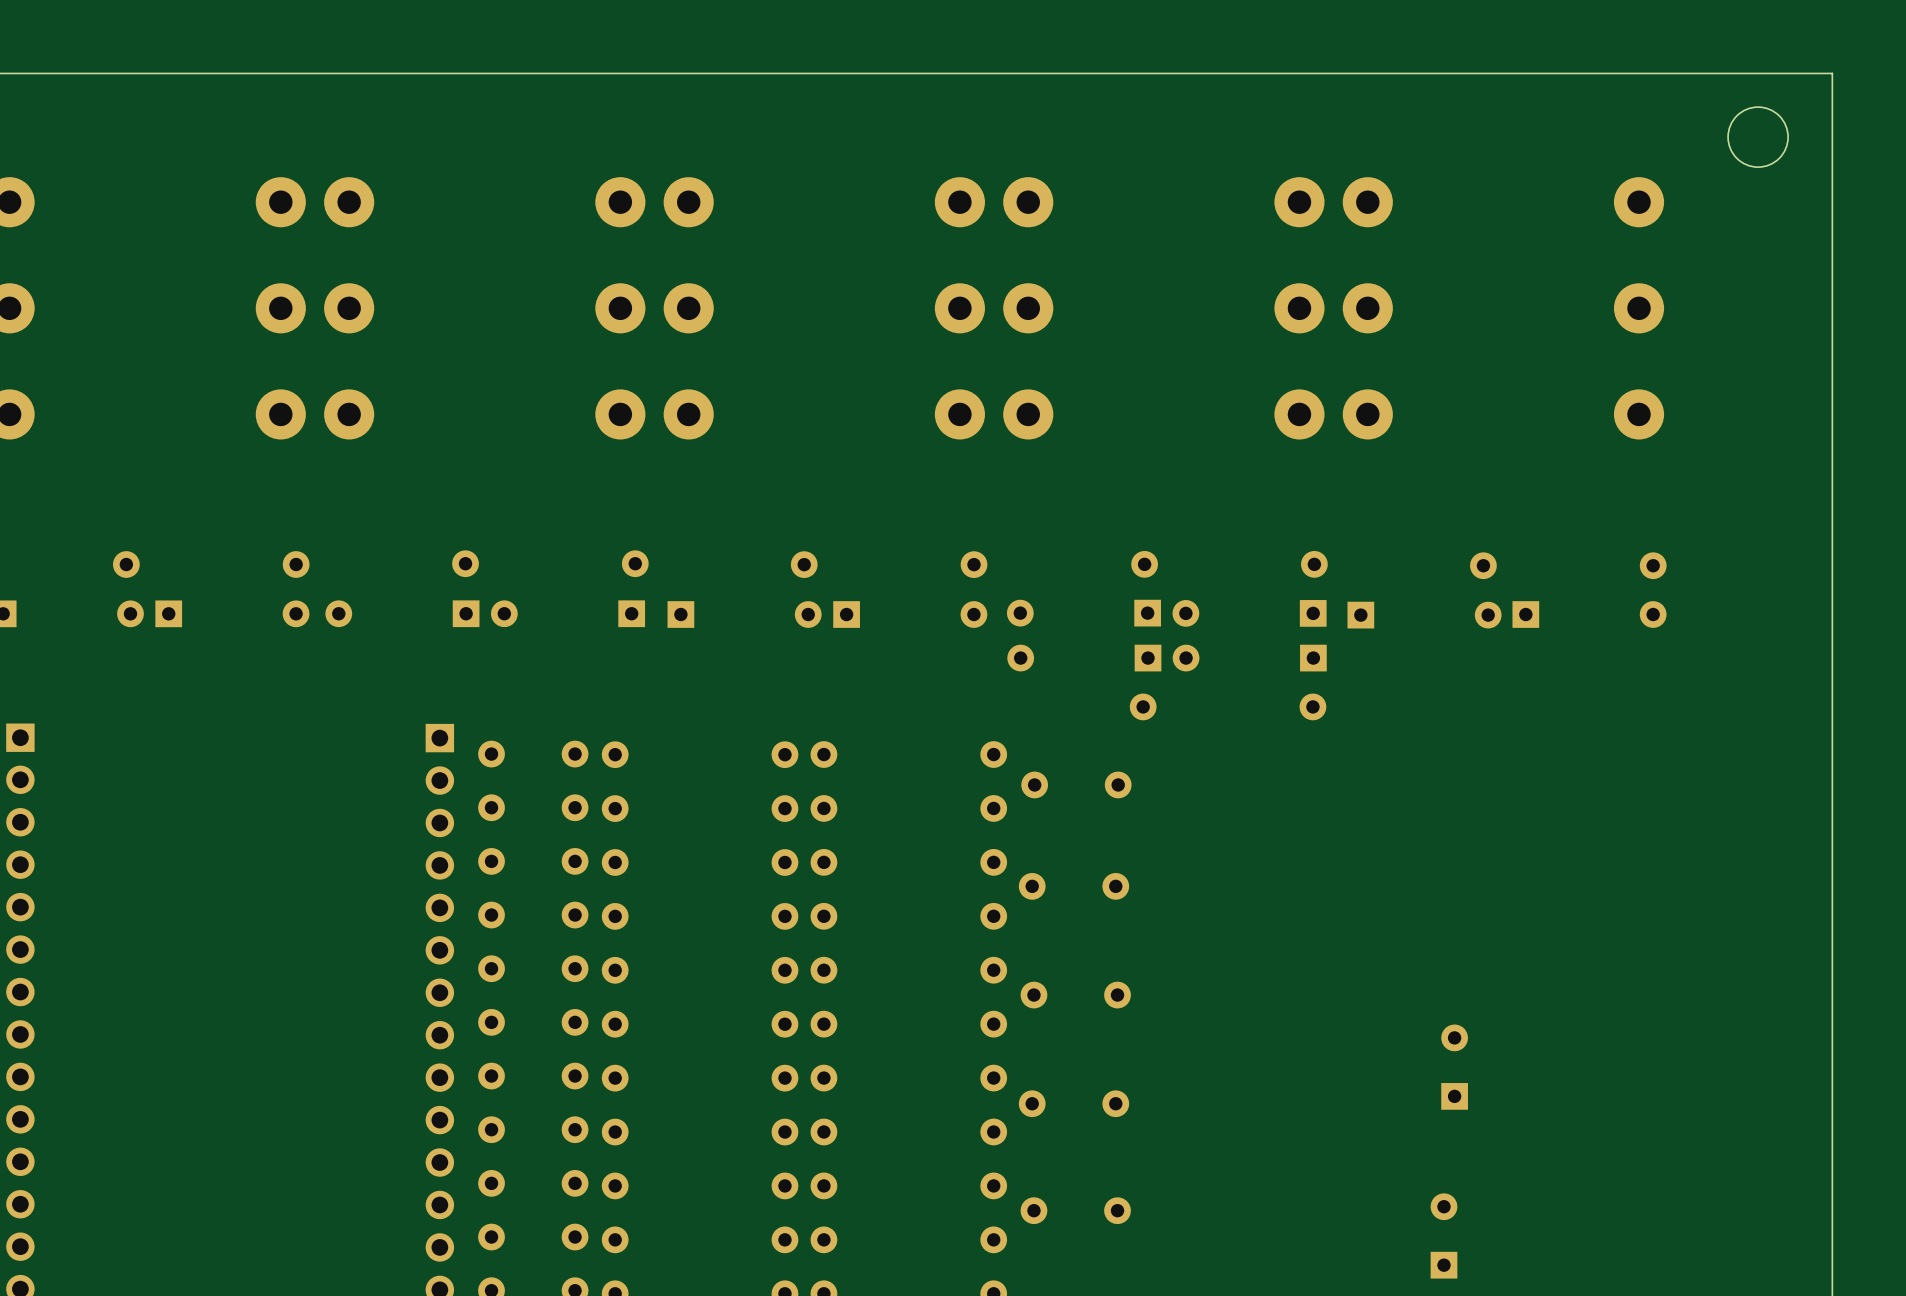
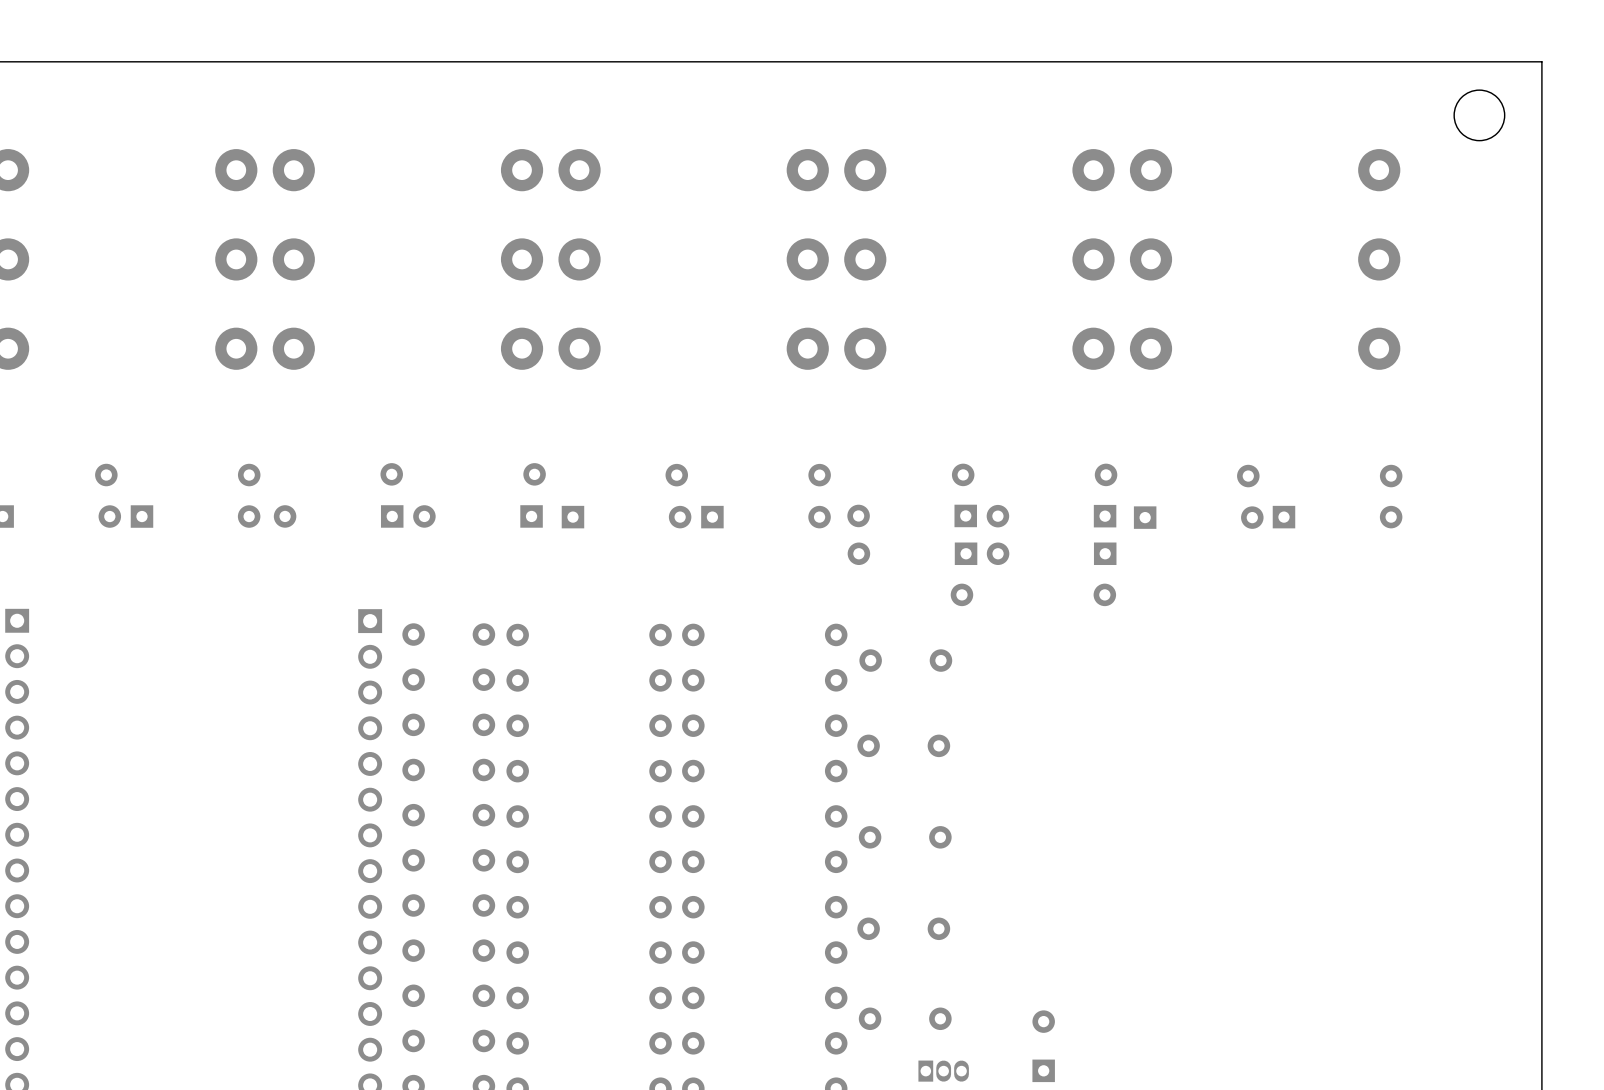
part: (1454, 1067) -> none
part: (1443, 1235) -> none
part: none -> (1043, 1046)
part: none -> (943, 1071)

